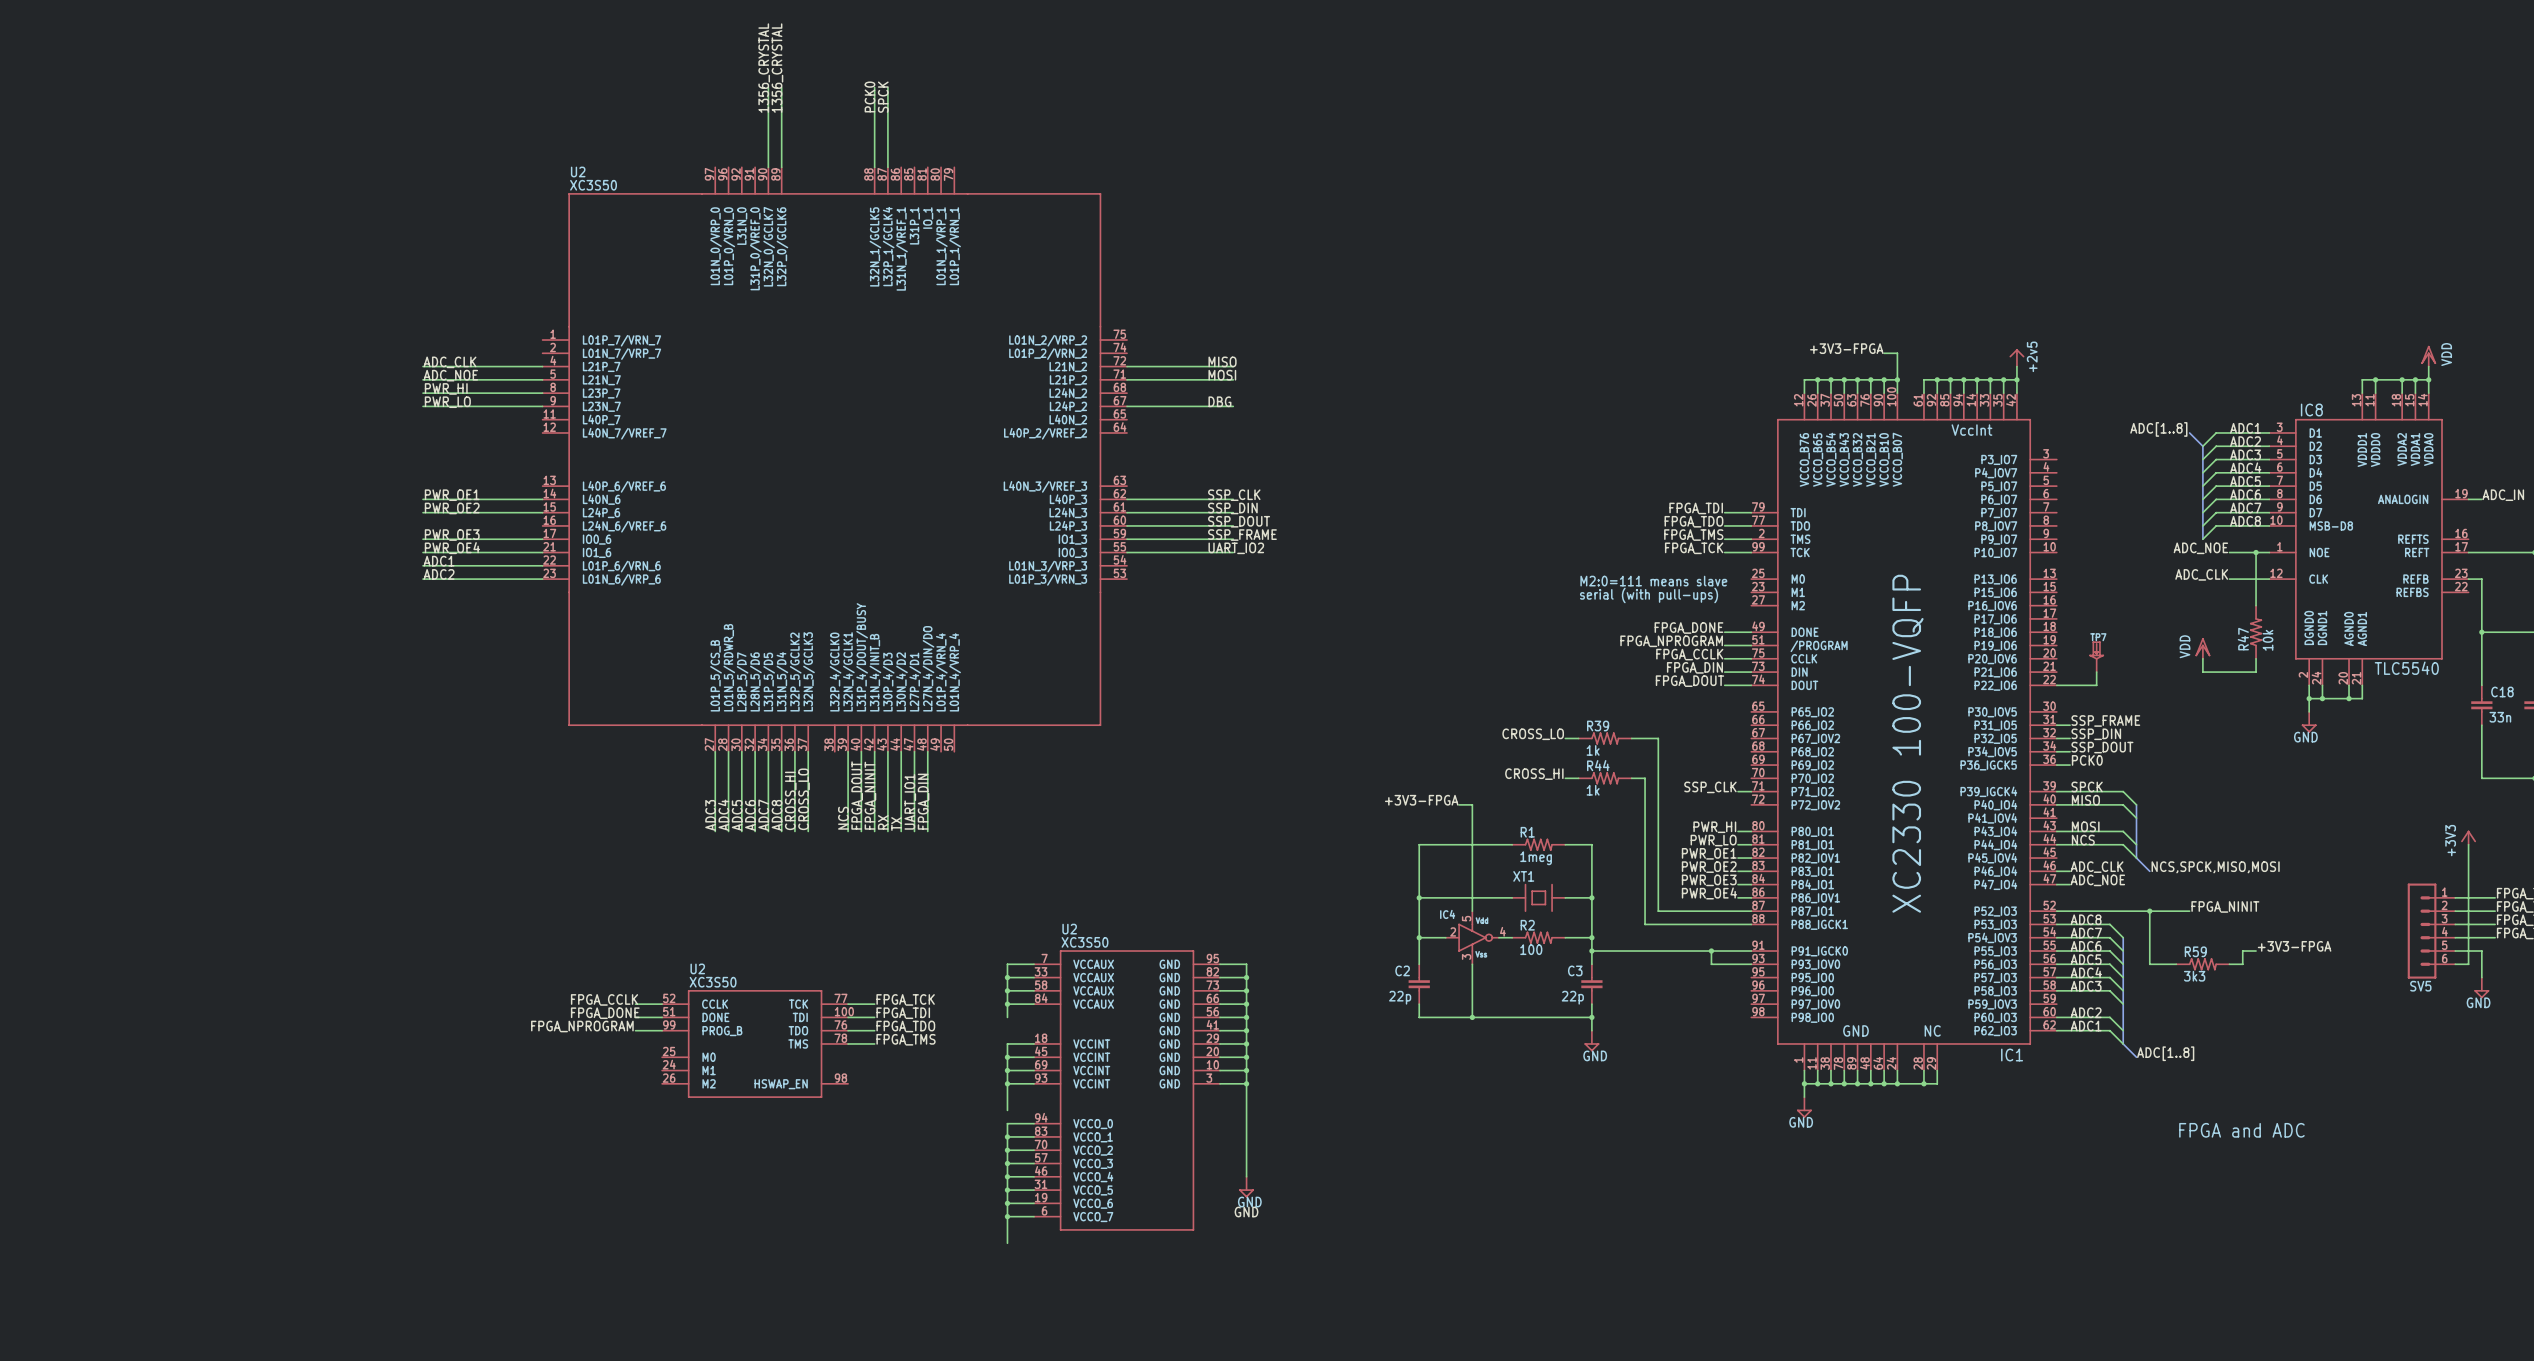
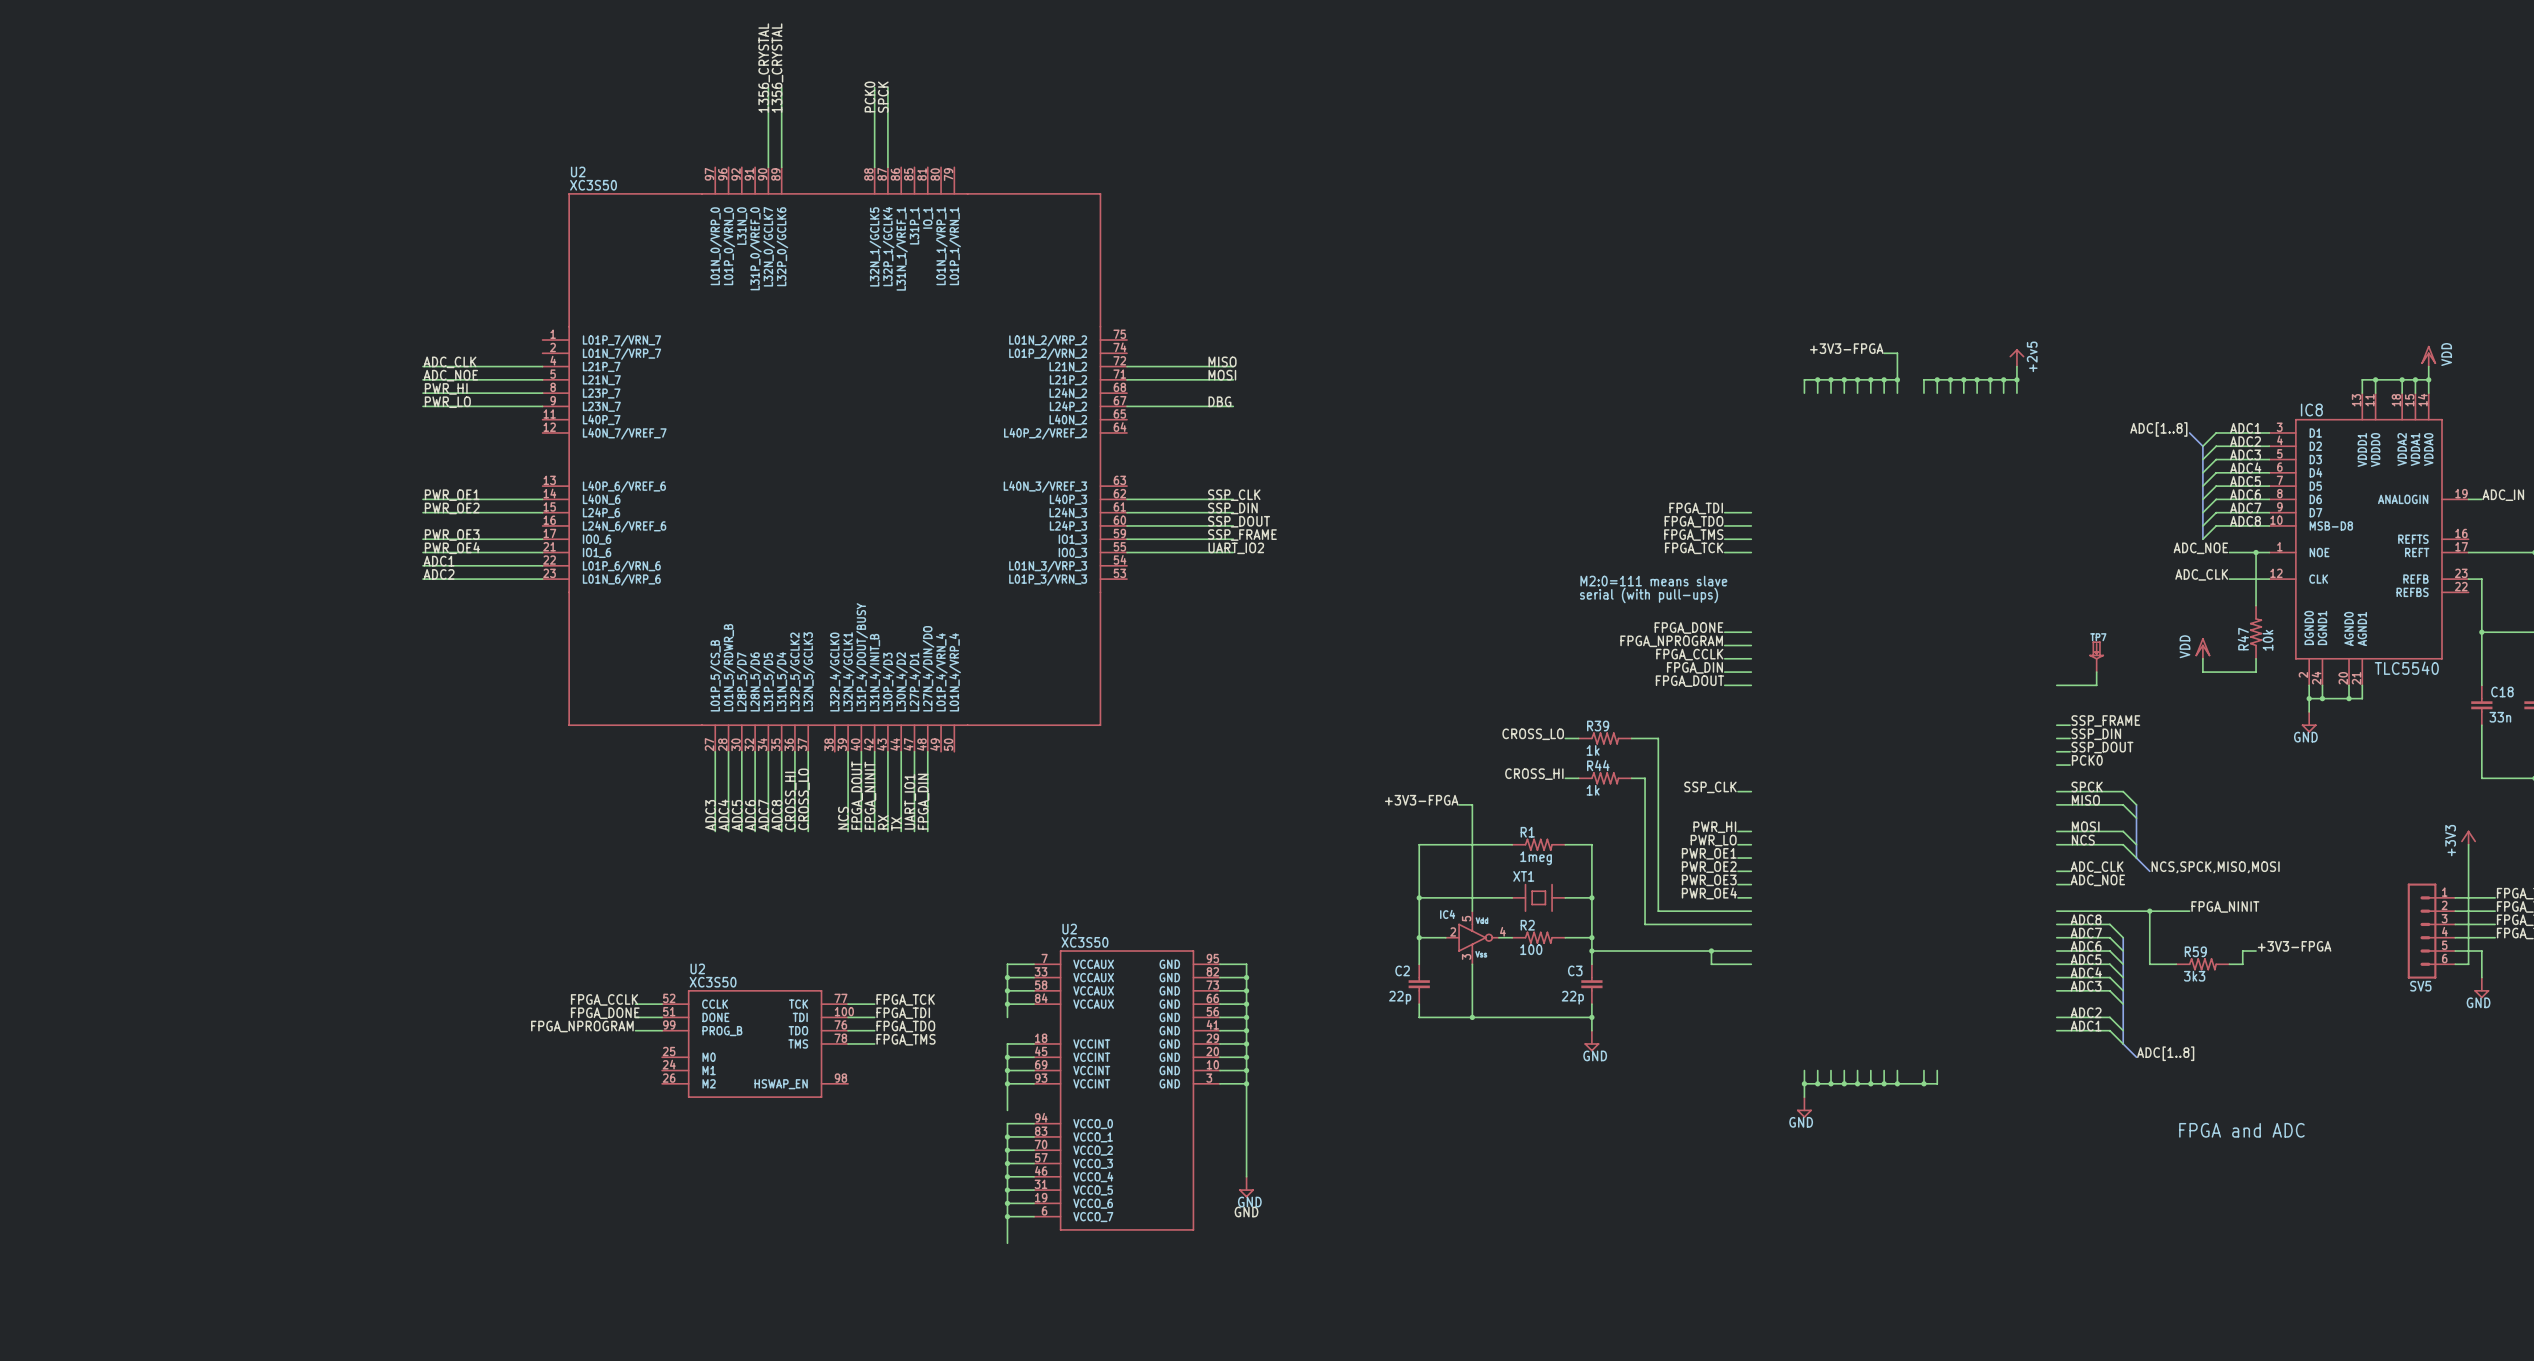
IC1: (1904, 731) -> none

